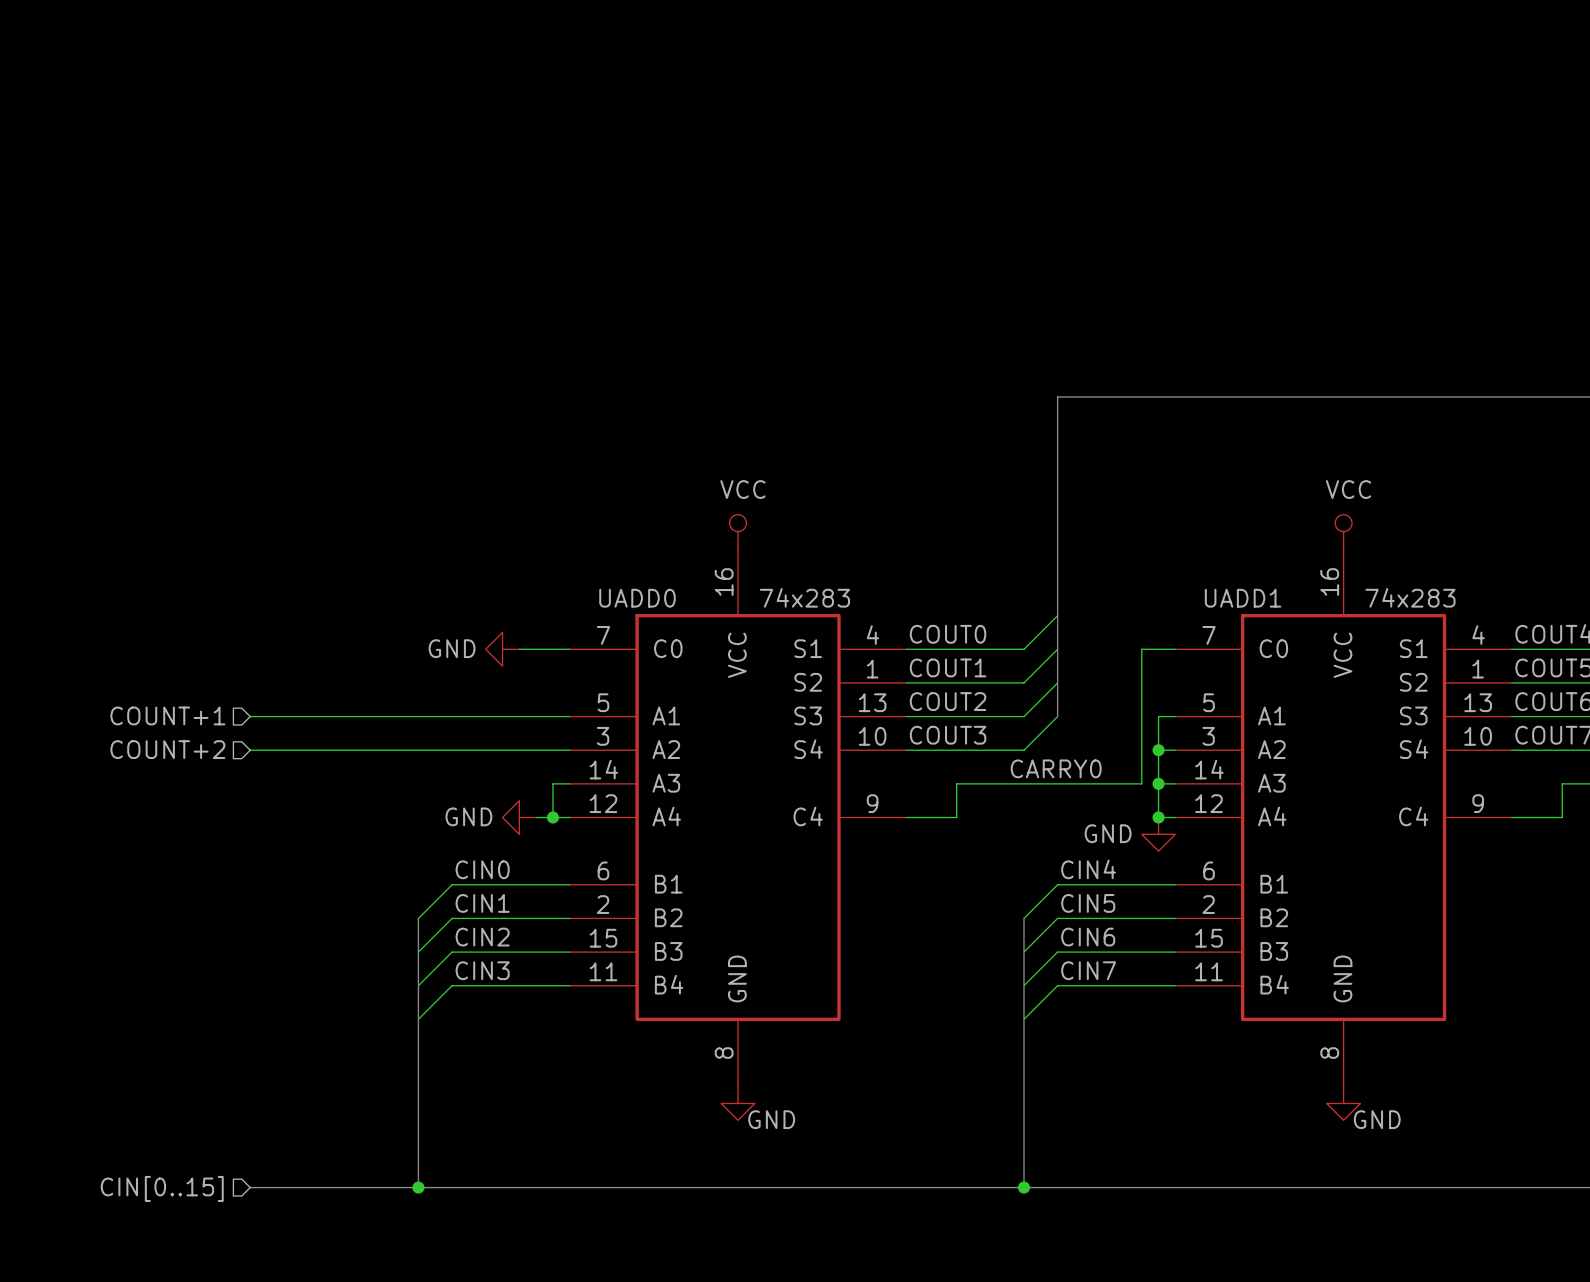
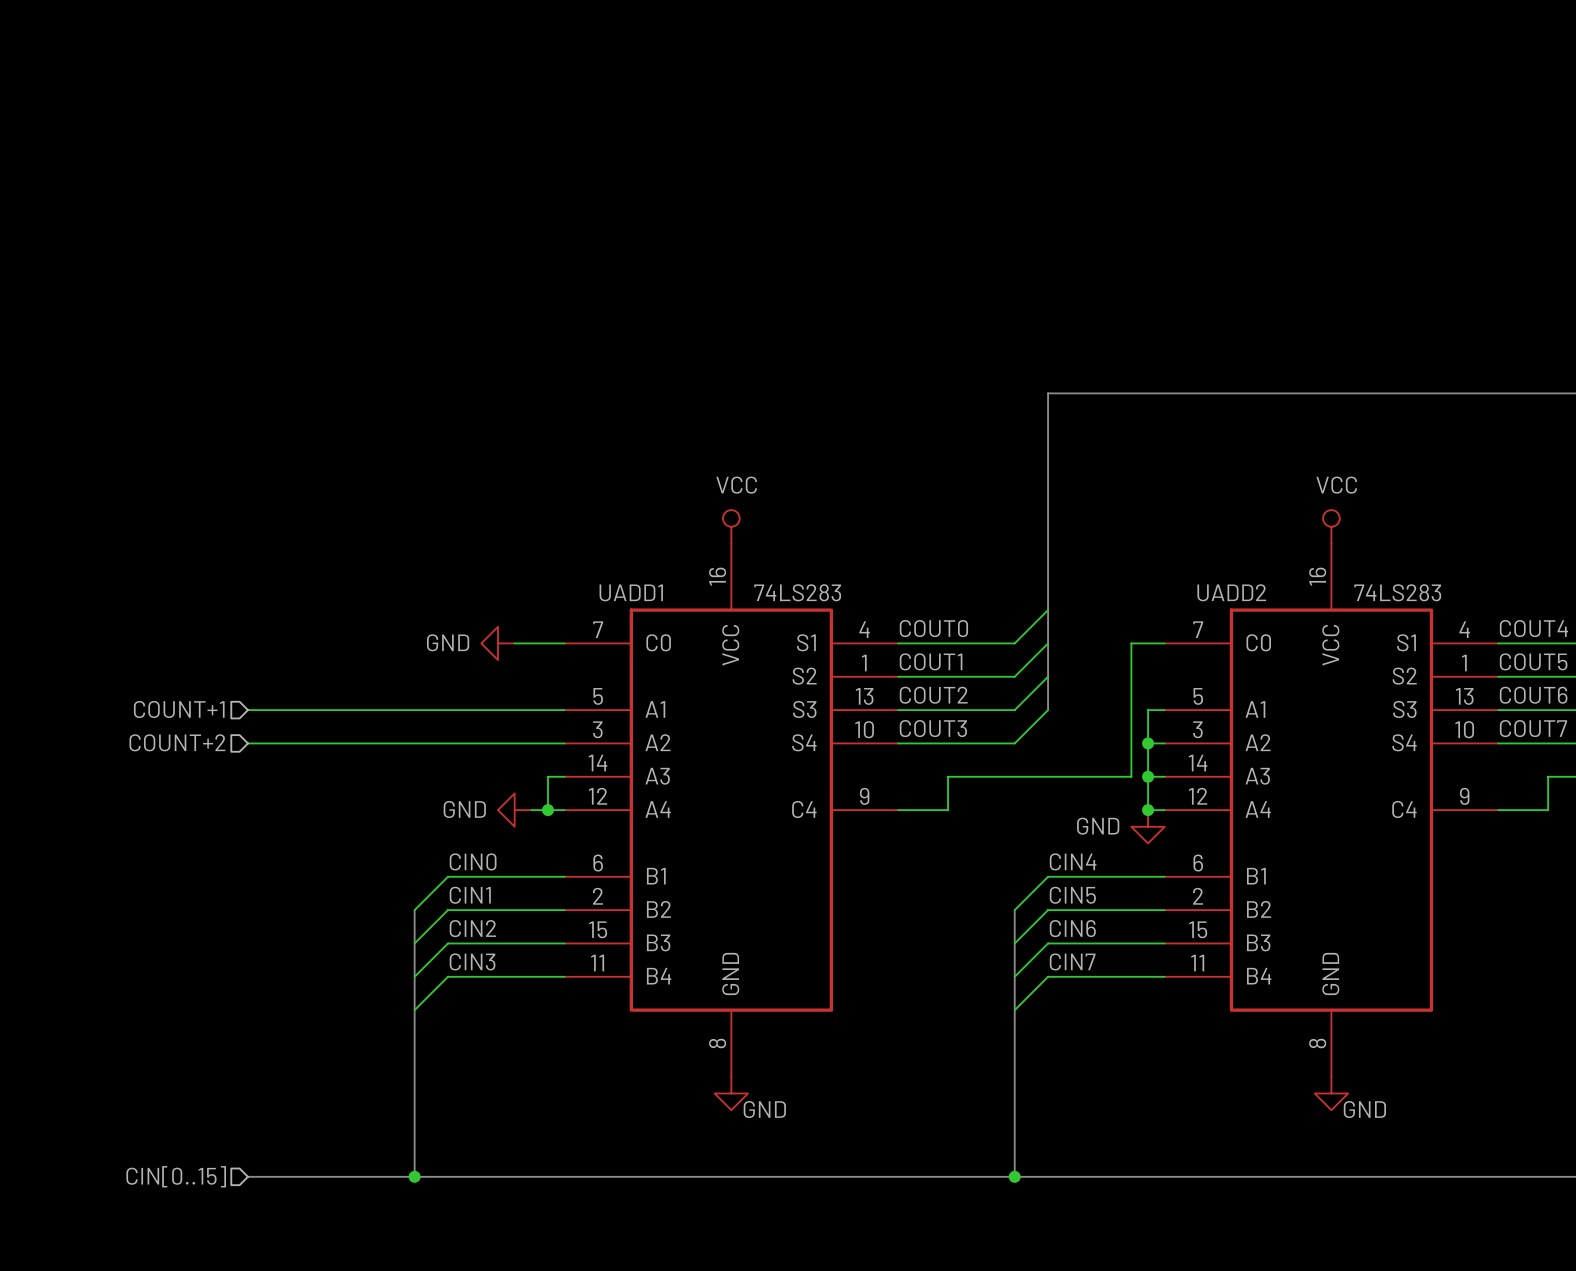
UADD0 value: 74x283 (804, 597) -> 74LS283 (797, 592)
UADD1 value: 74x283 (1410, 597) -> 74LS283 (1397, 592)
UADD0 name: UADD0 (637, 598) -> UADD1 (631, 592)
UADD1 name: UADD1 (1243, 598) -> UADD2 (1231, 592)
label: CARRY0 (1056, 768) -> none

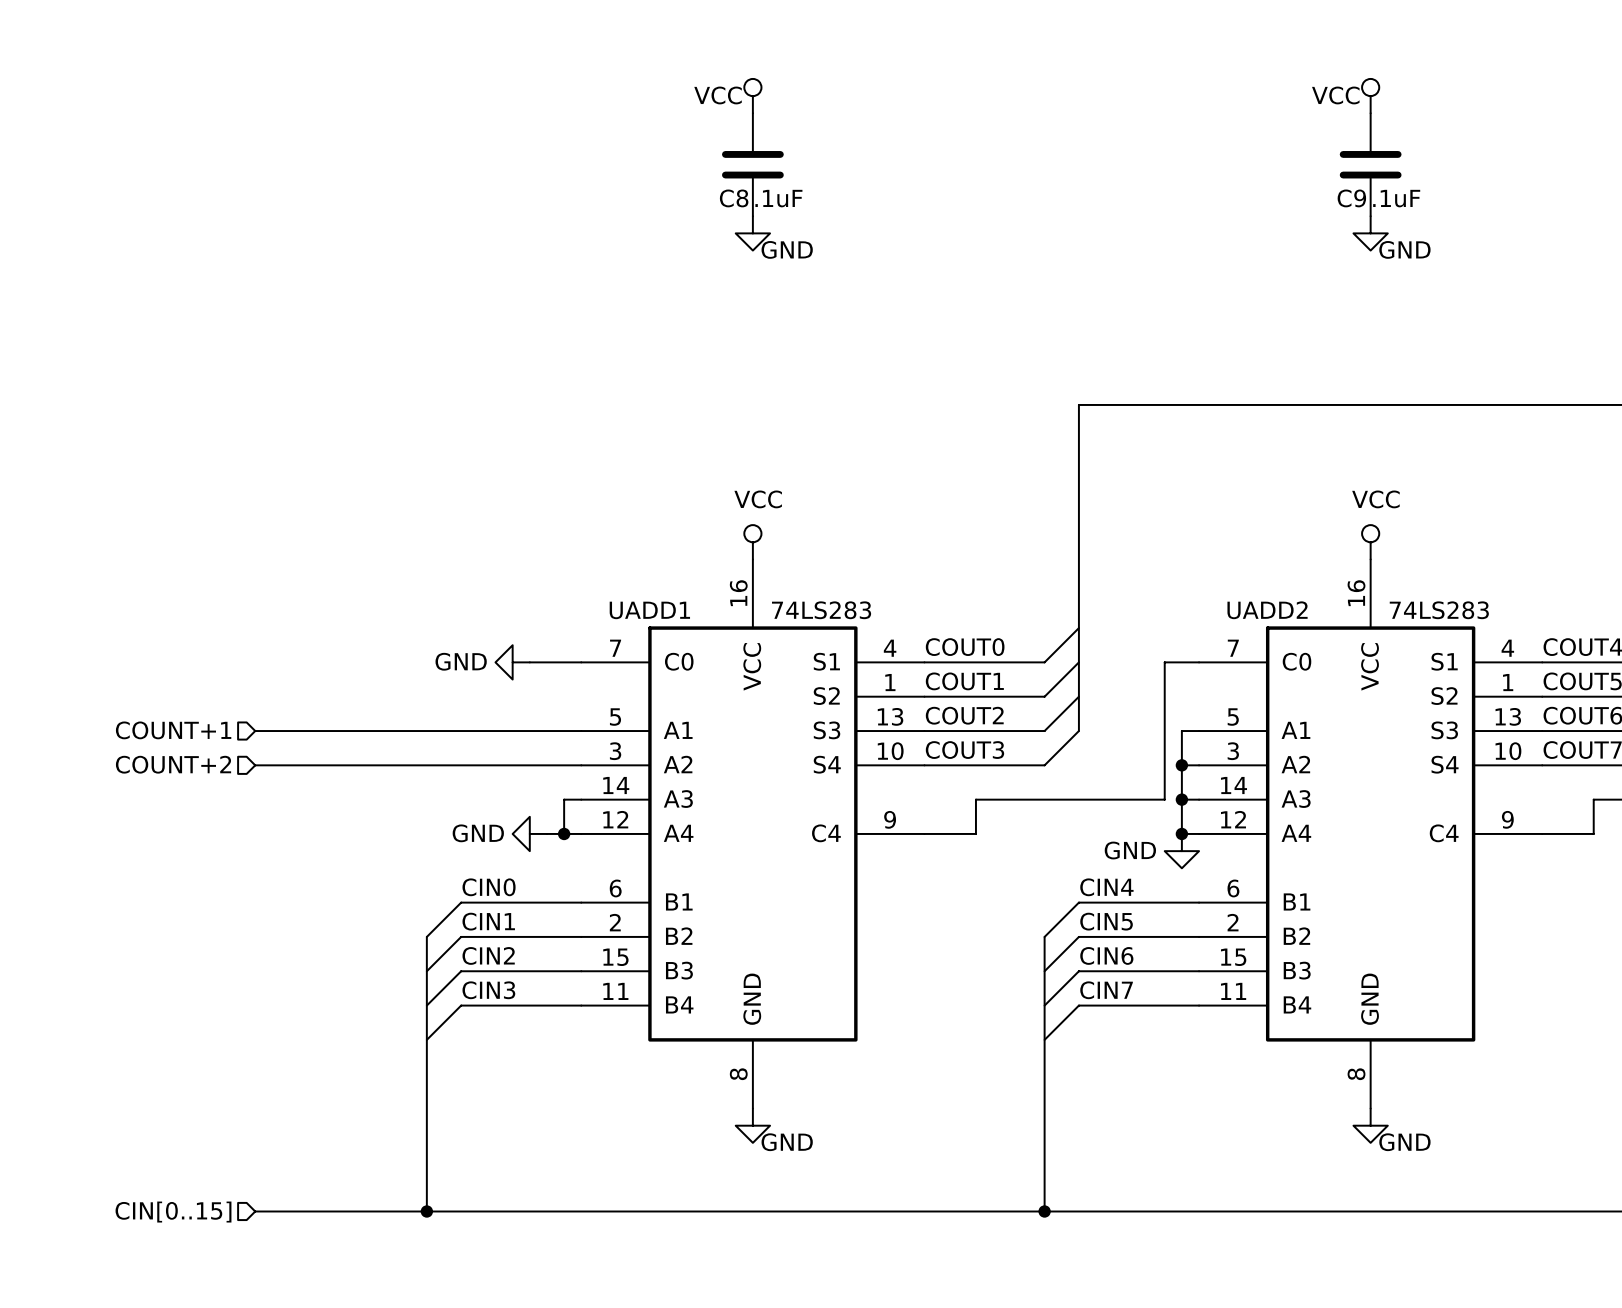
power symbol: none -> VCC (752, 96)
power symbol: none -> VCC (1370, 96)
C8: none -> .1uF (752, 164)
C9: none -> .1uF (1370, 164)
power symbol: none -> GND (752, 233)
power symbol: none -> GND (1370, 233)

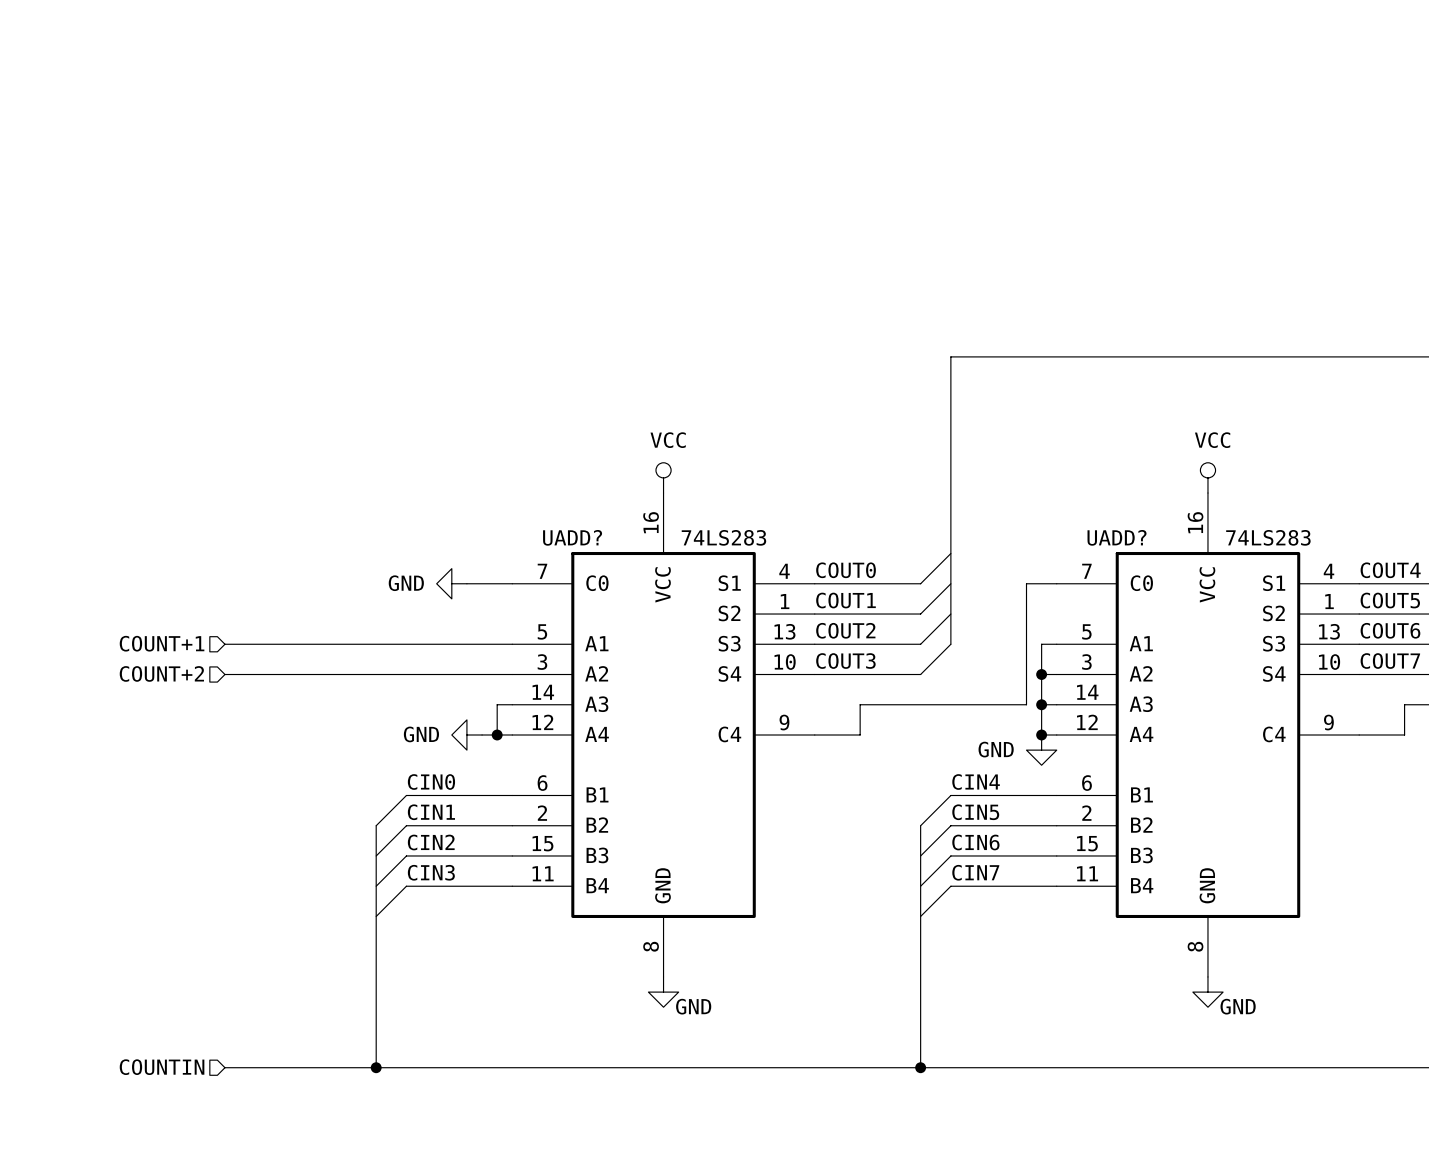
power symbol: VCC (752, 96) -> none
power symbol: VCC (1370, 96) -> none
C8: .1uF (752, 164) -> none
C9: .1uF (1370, 164) -> none
power symbol: GND (752, 233) -> none
power symbol: GND (1370, 233) -> none
UADD1 name: UADD1 (649, 610) -> UADD? (572, 537)
UADD2 name: UADD2 (1267, 610) -> UADD? (1117, 537)
hierarchical label: CIN[0..15] (173, 1212) -> COUNTIN (162, 1067)

